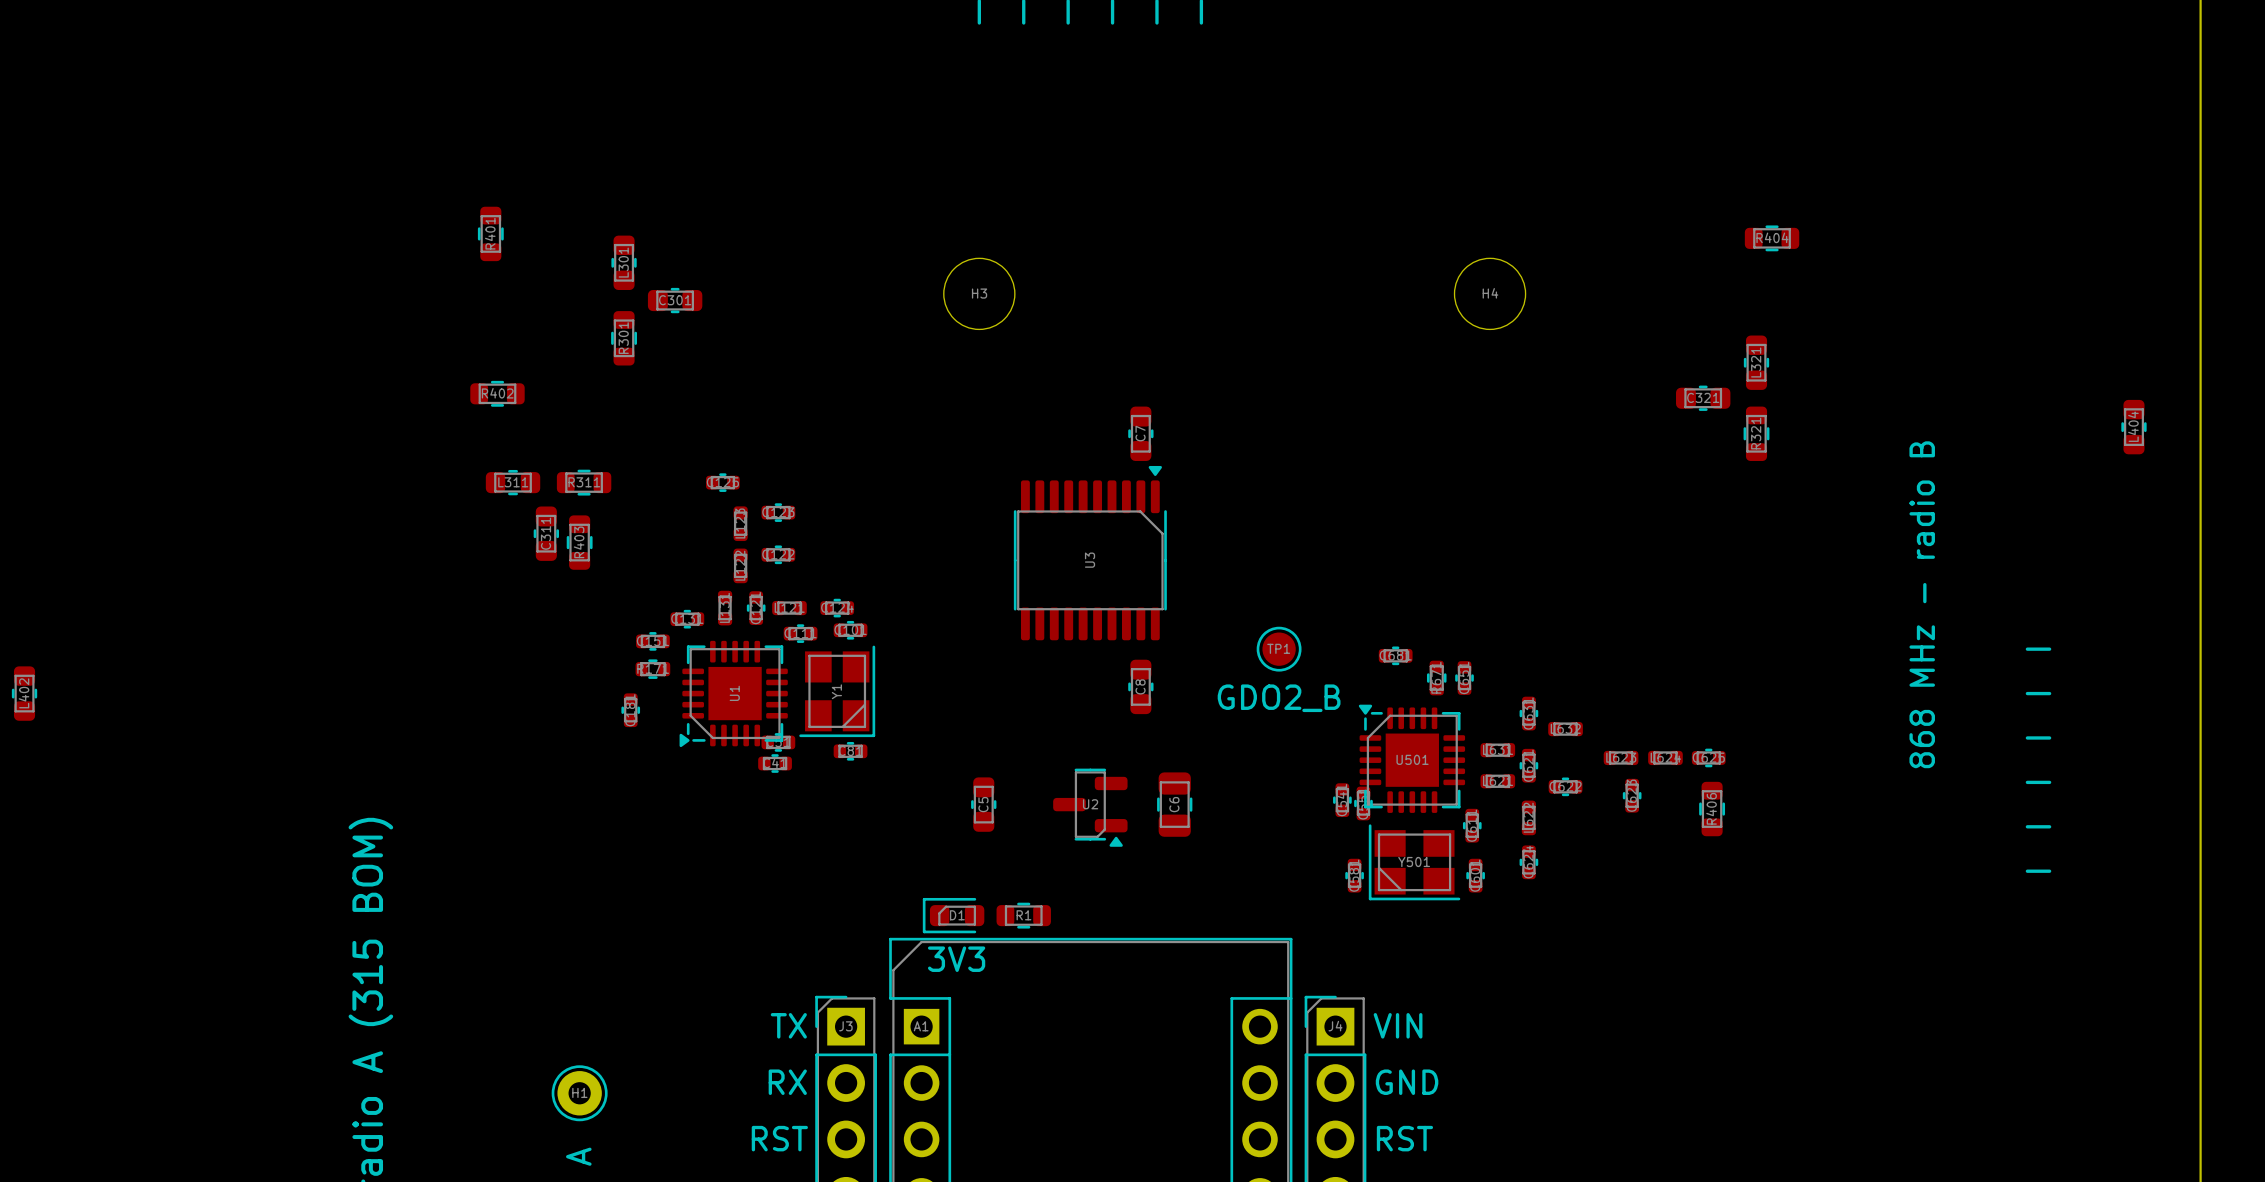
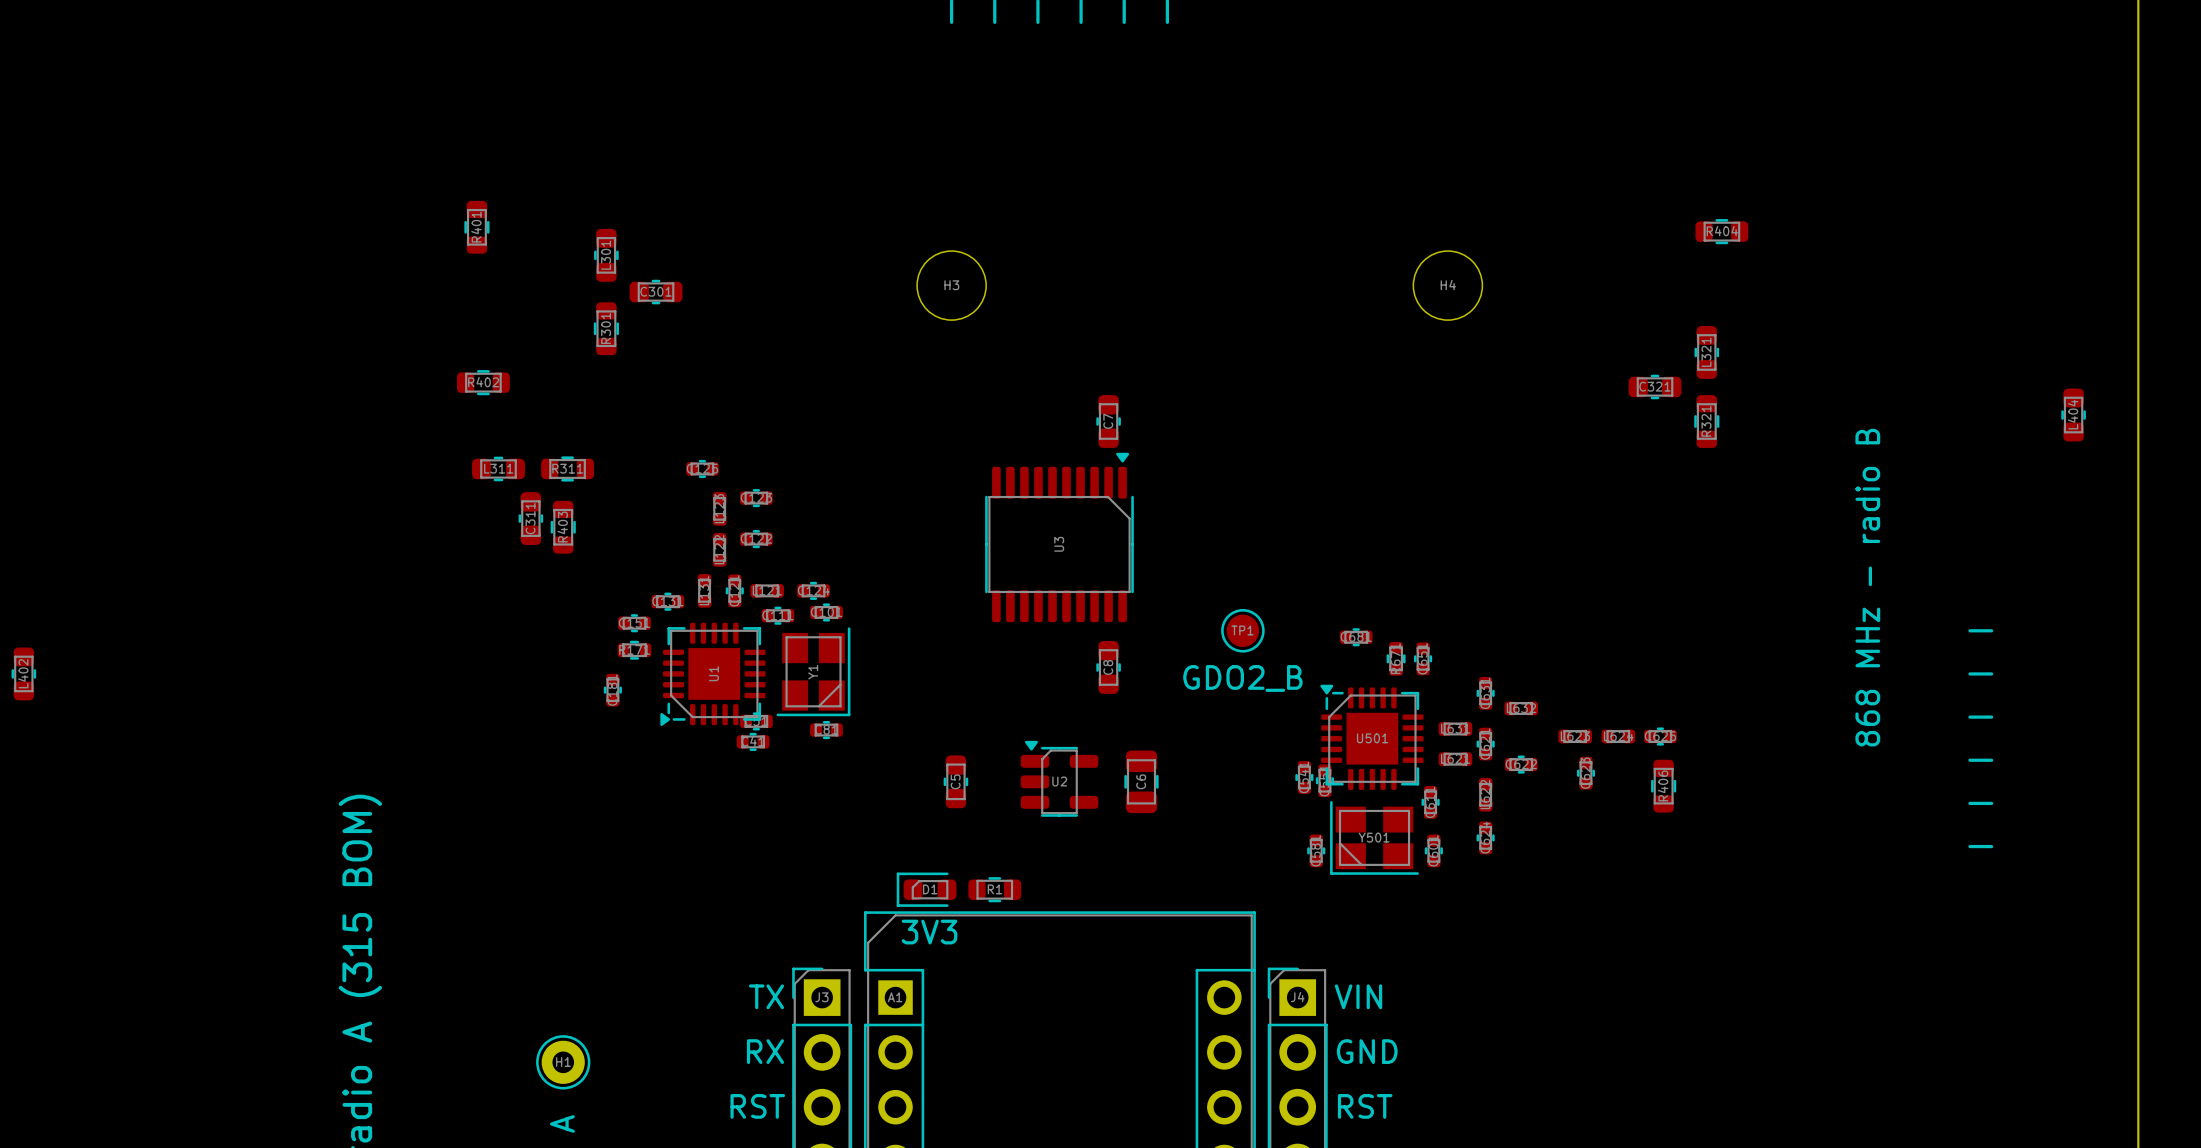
U2 footprint: [1053, 768, 1128, 847] -> [1020, 740, 1099, 817]

